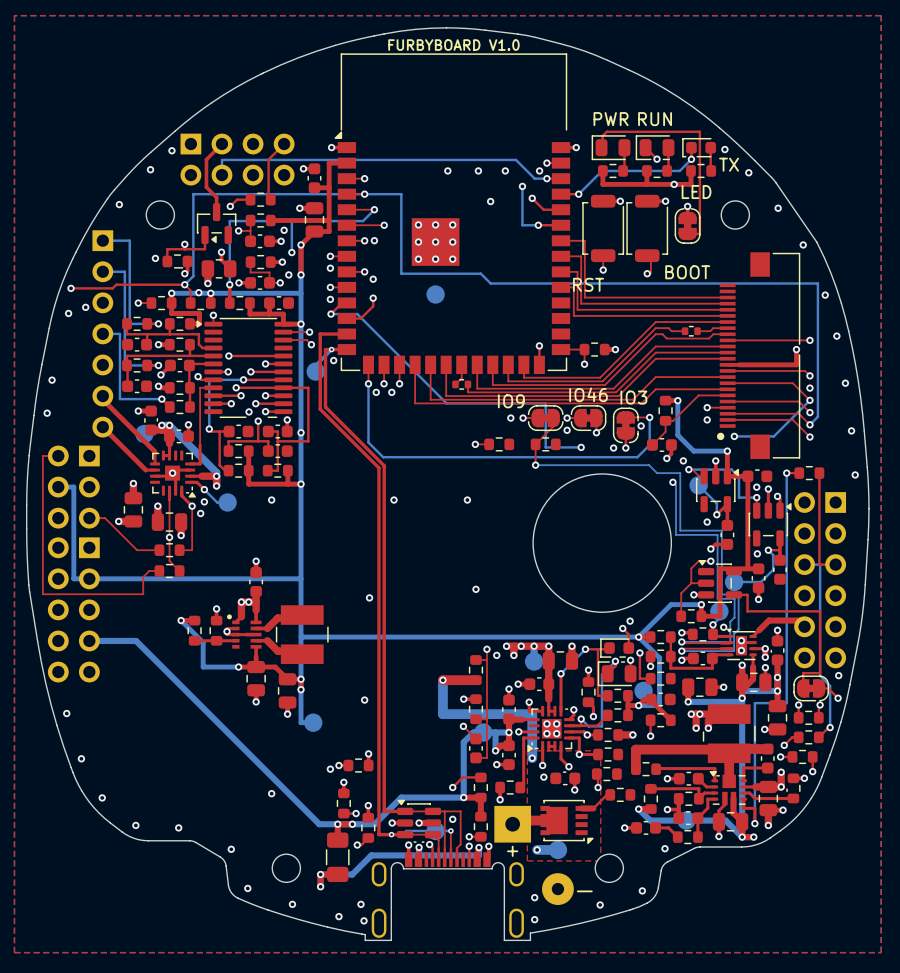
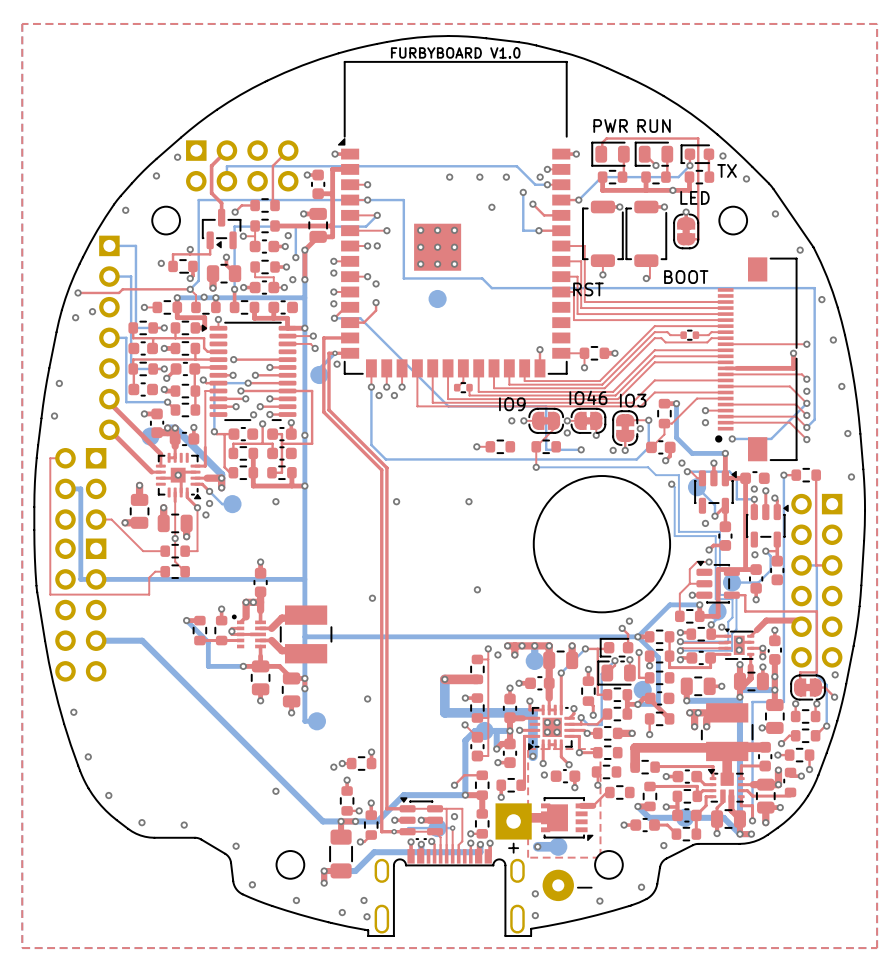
part footprint: [786, 773, 801, 804] -> [783, 767, 797, 798]

